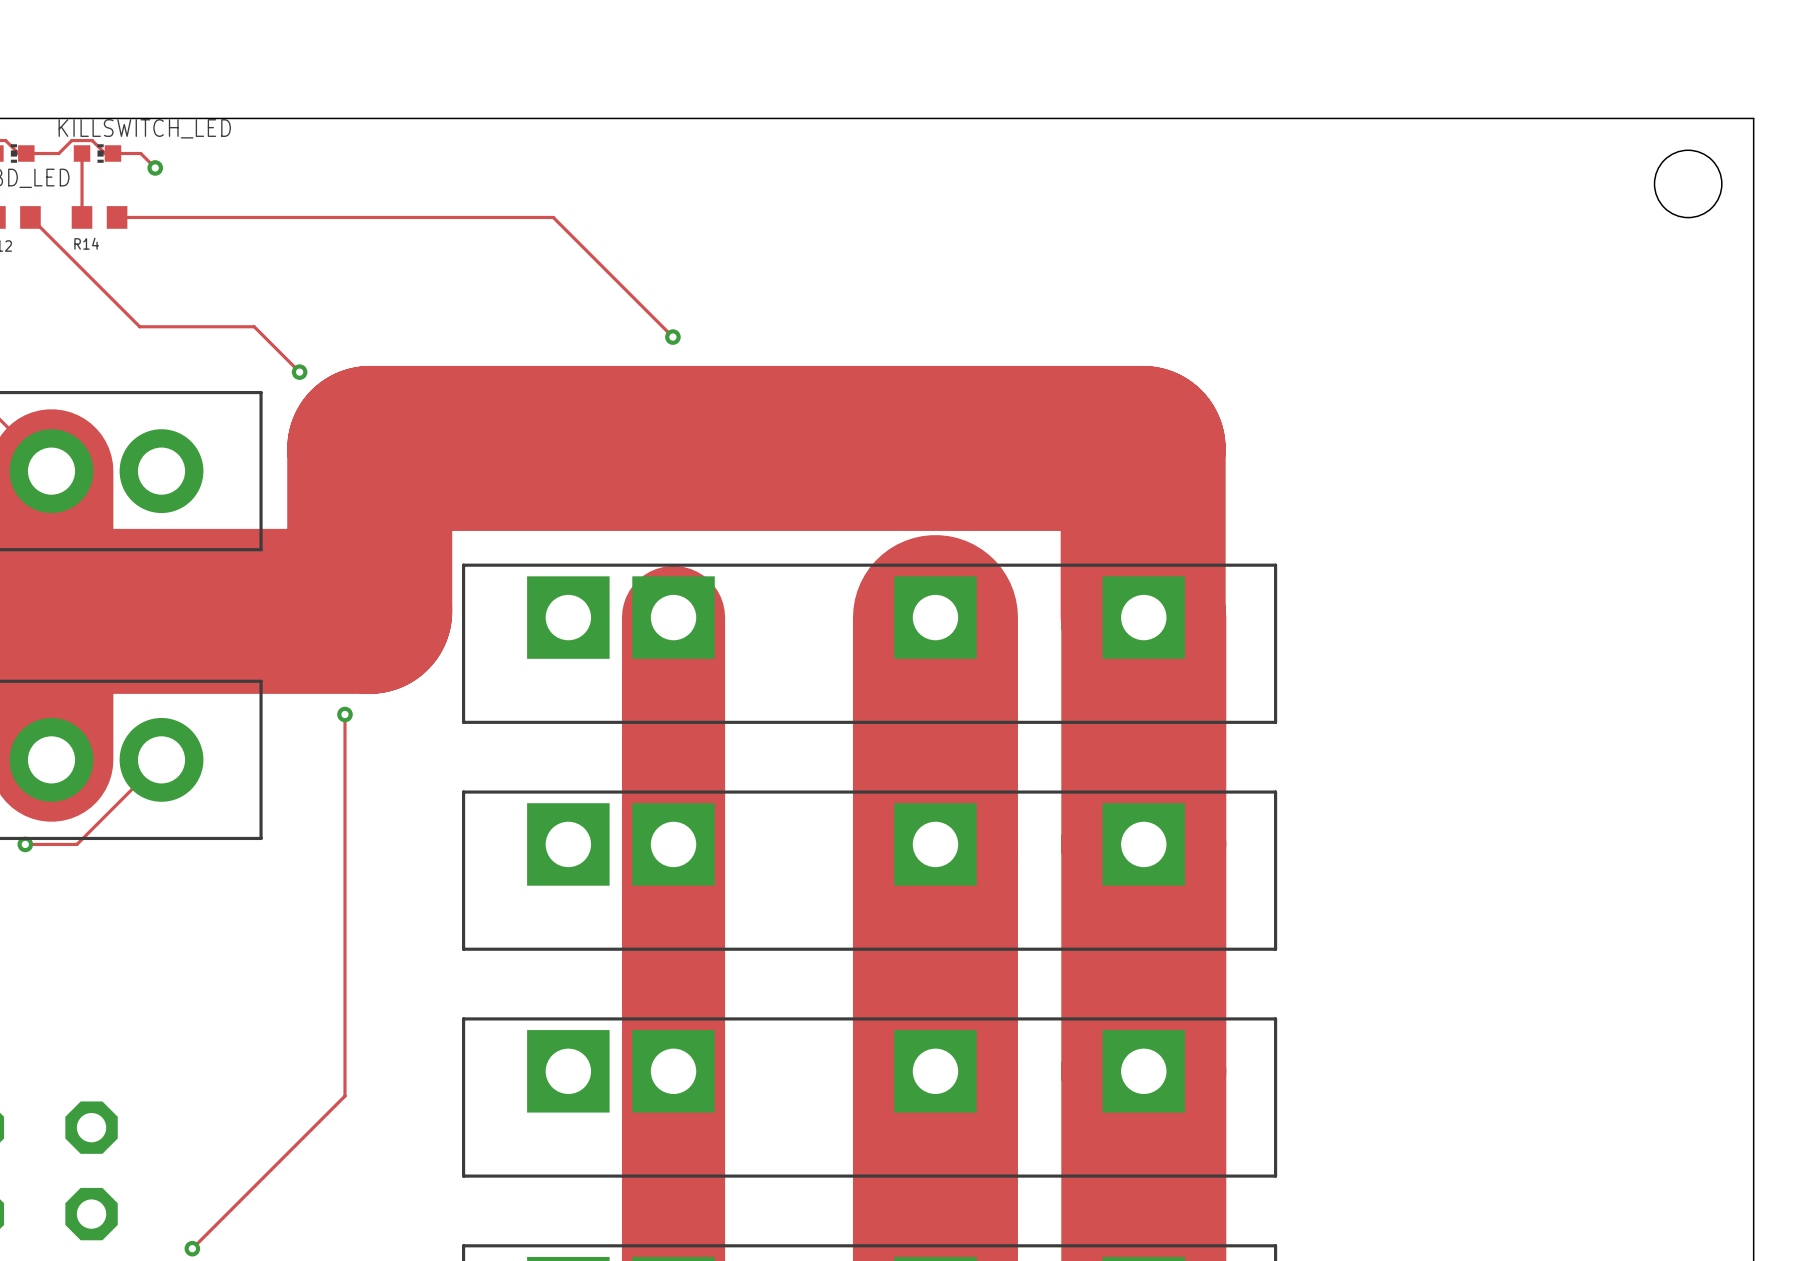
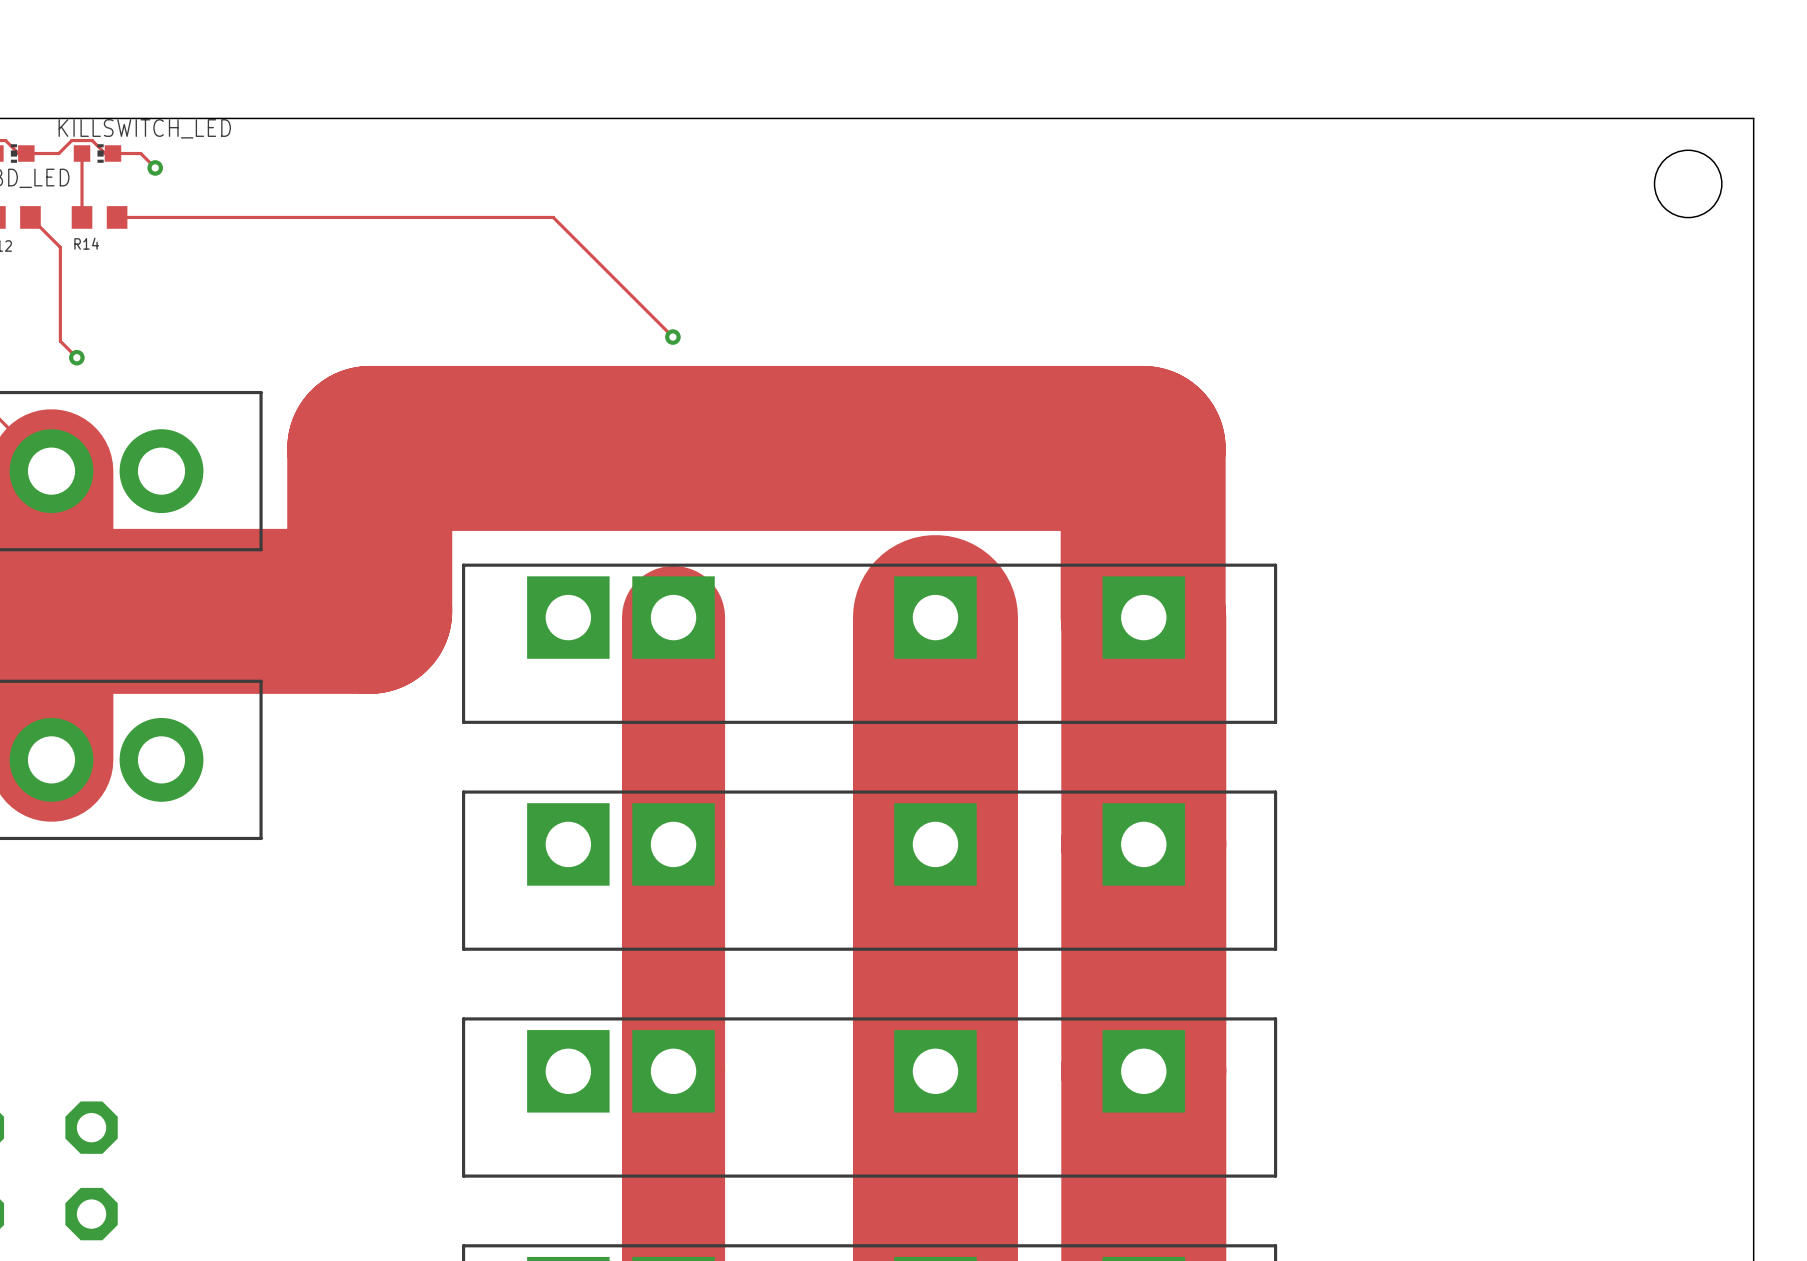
track: (60, 247) (139, 326) (254, 326) (299, 372) -> (60, 247) (60, 341) (76, 357)
via: none -> (76, 357)
via: (299, 372) -> none
track: (344, 714) (344, 1096) (192, 1248) -> none
via: (344, 714) -> none
track: (161, 759) (76, 844) (25, 844) -> none
via: (25, 844) -> none
via: (192, 1248) -> none

